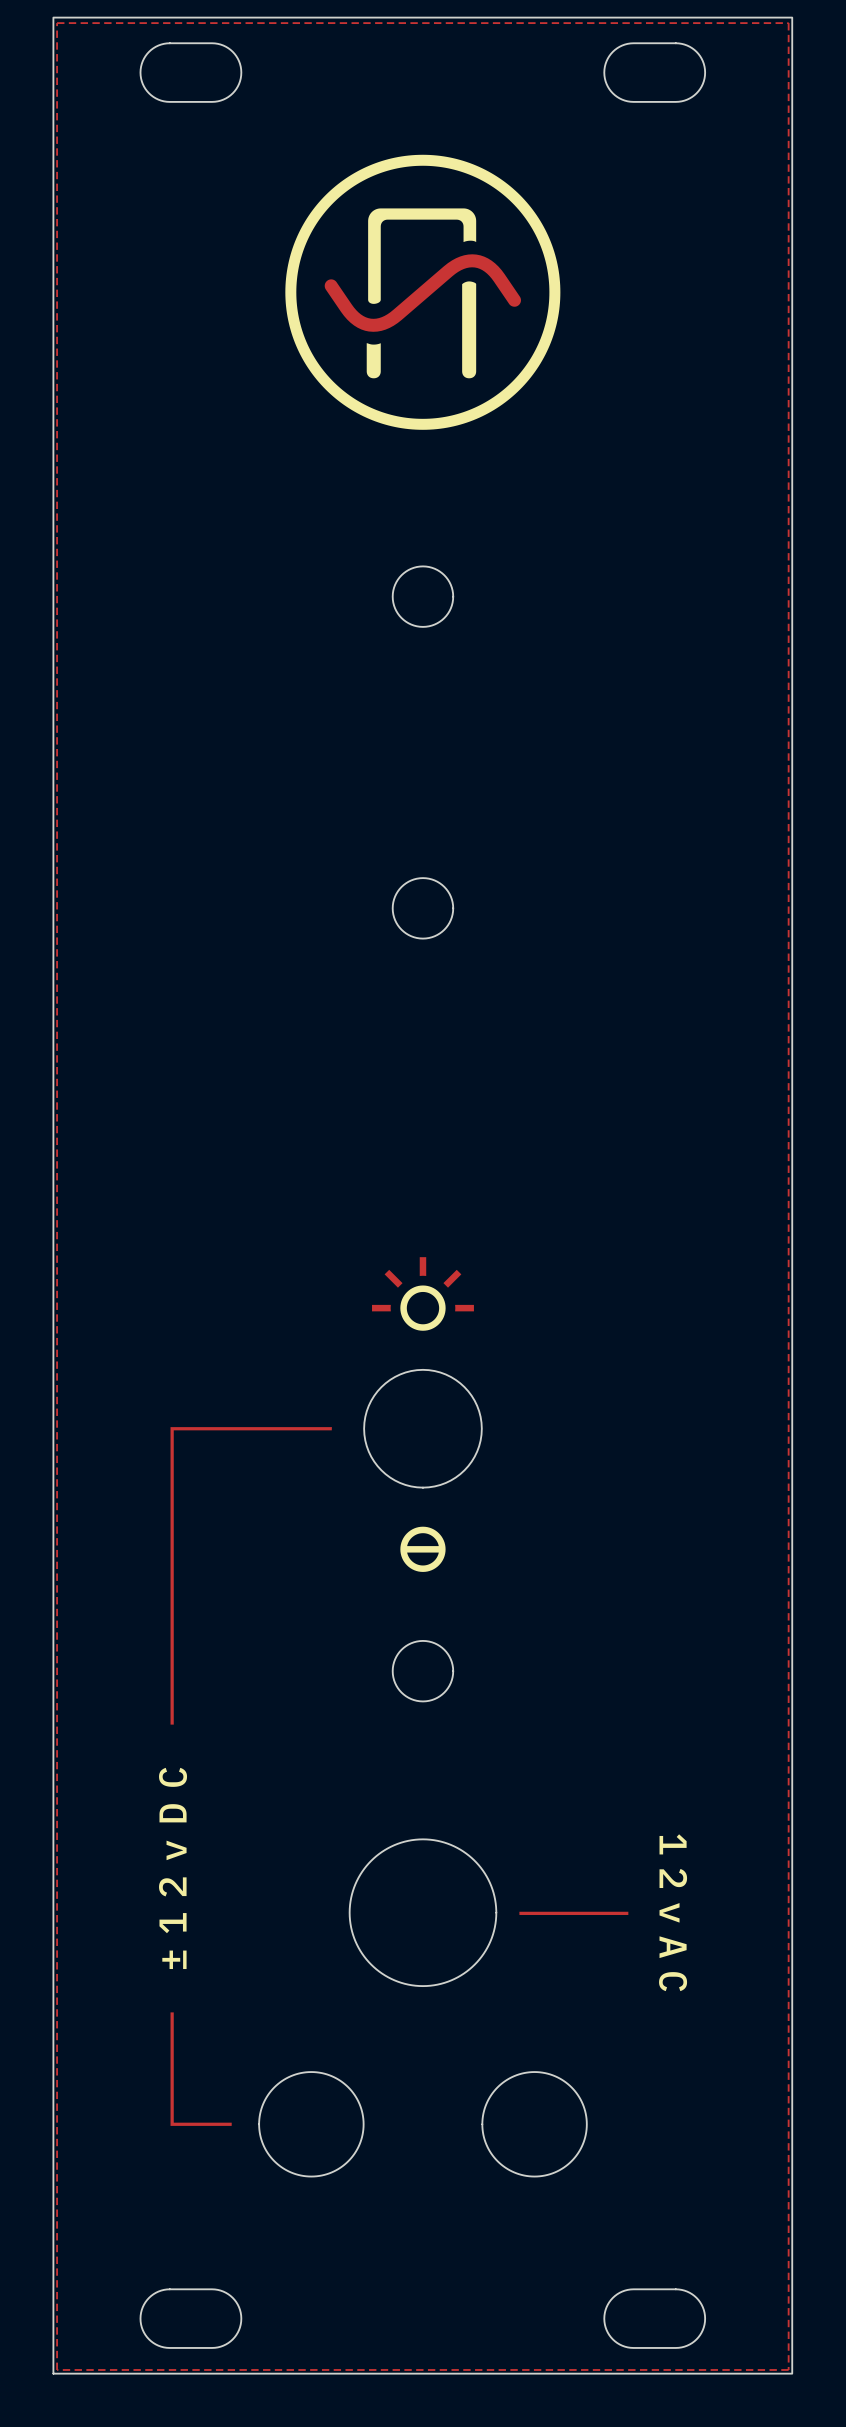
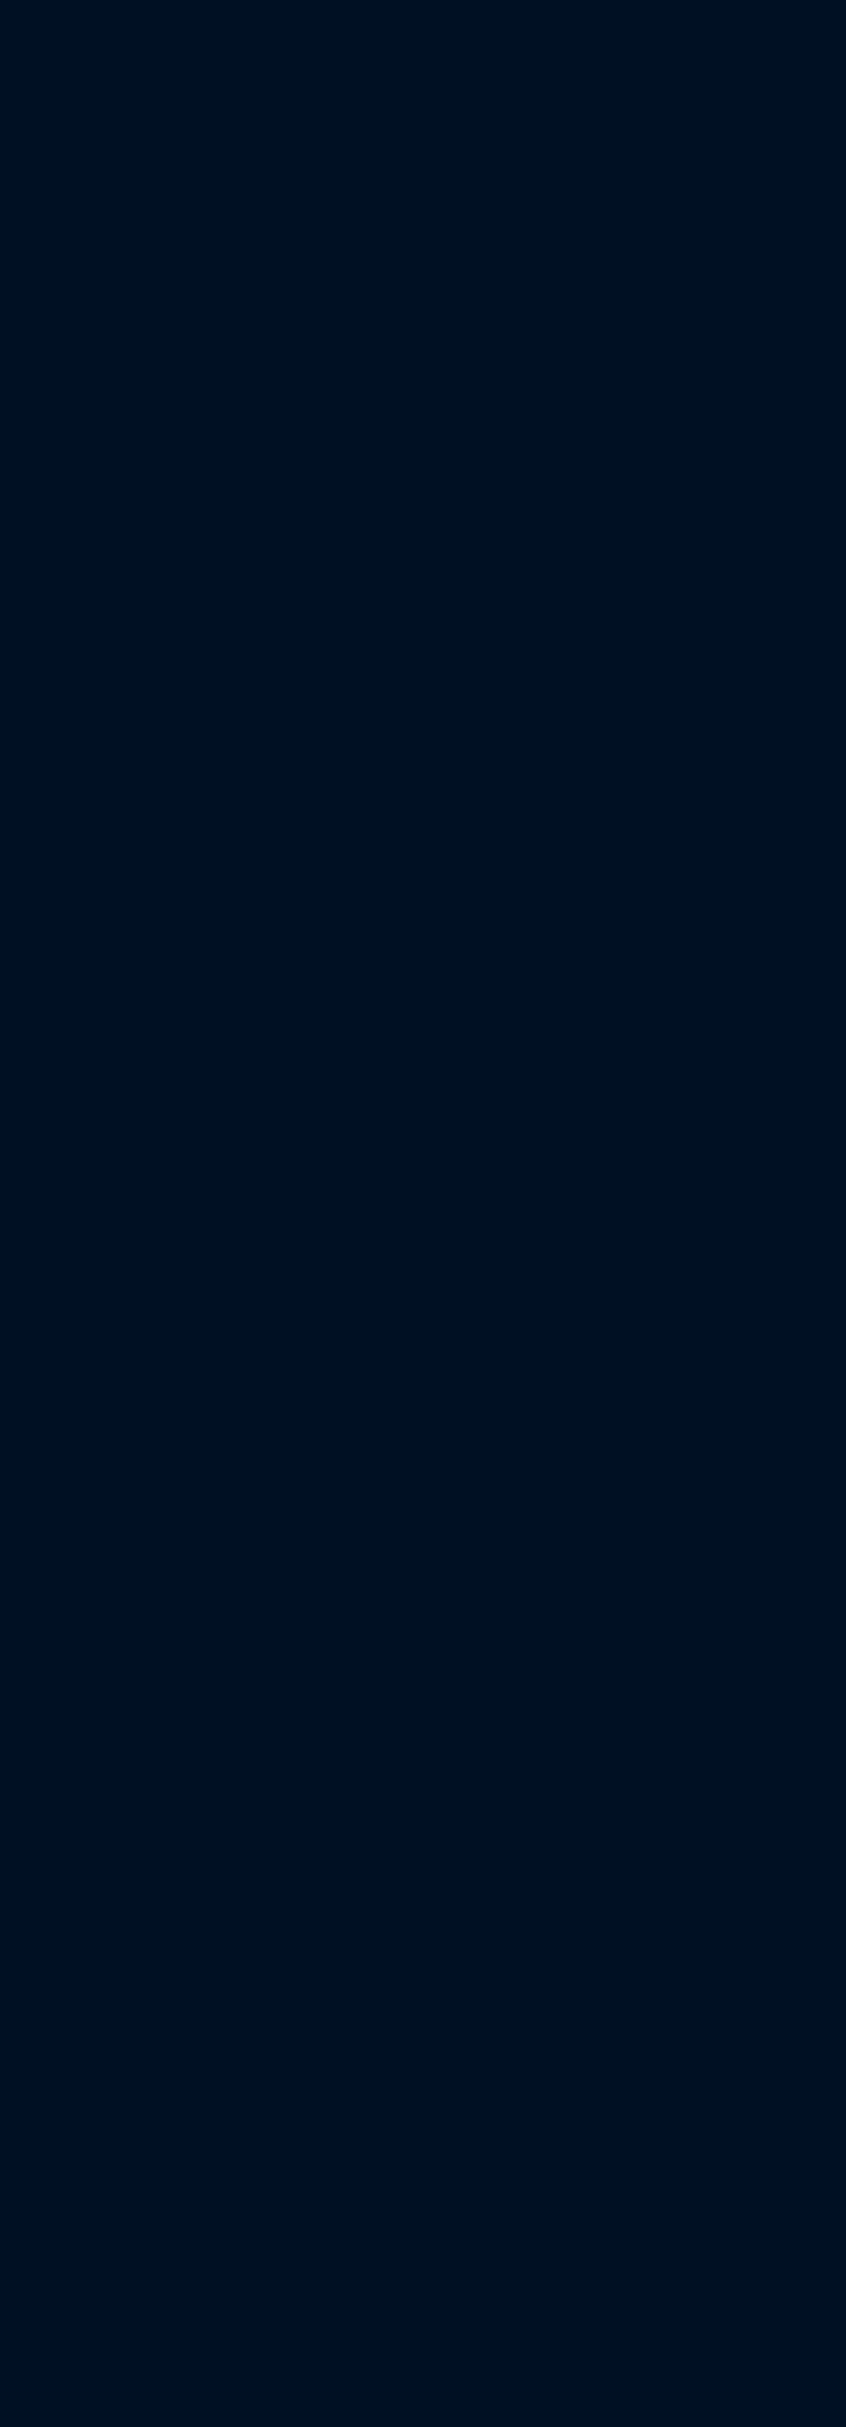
drawing: [53, 17, 793, 2374] -> none
zone outline: (57, 23) (57, 2369) (788, 2369) (788, 23) (57, 23) -> none

